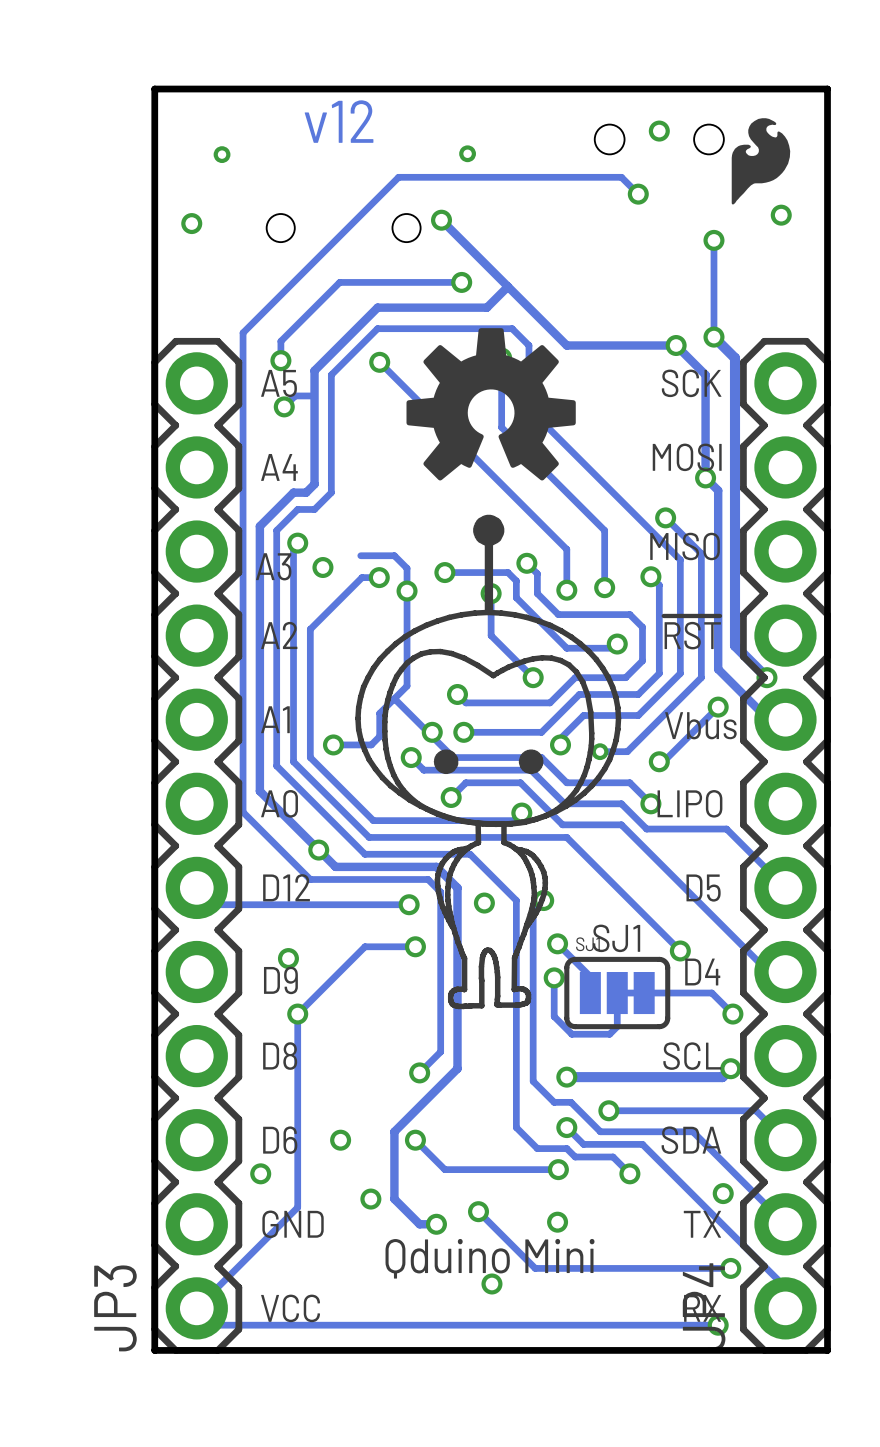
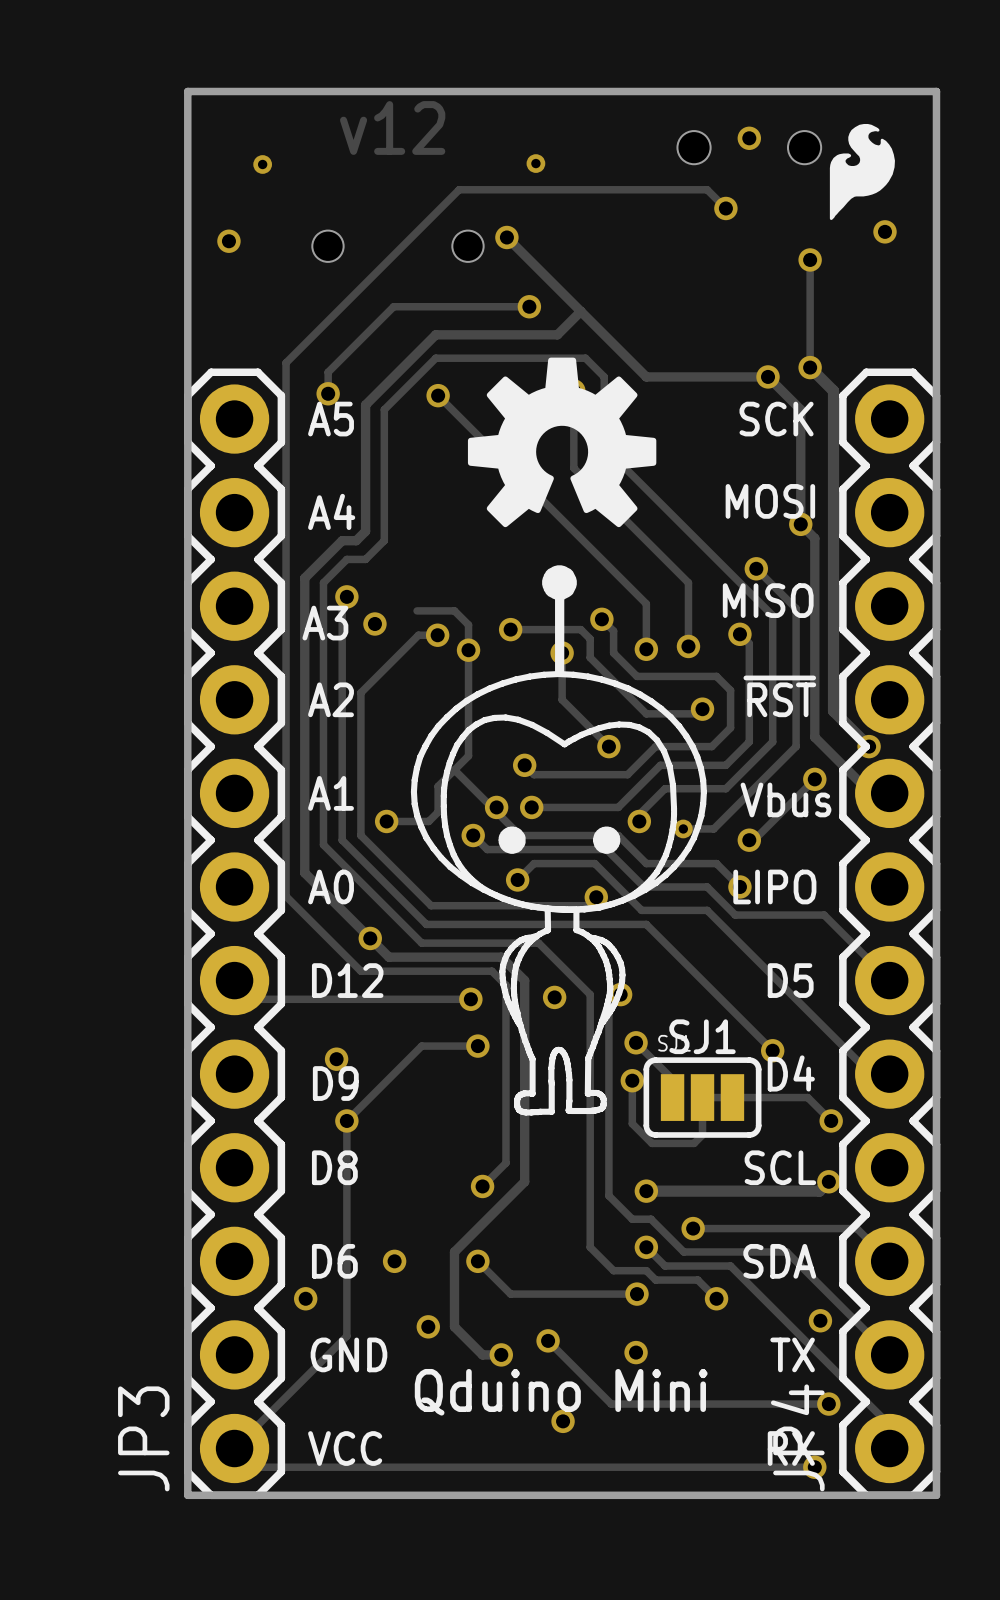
track: (314, 395) (295, 395) (284, 406) -> none
via: (284, 406) -> none

